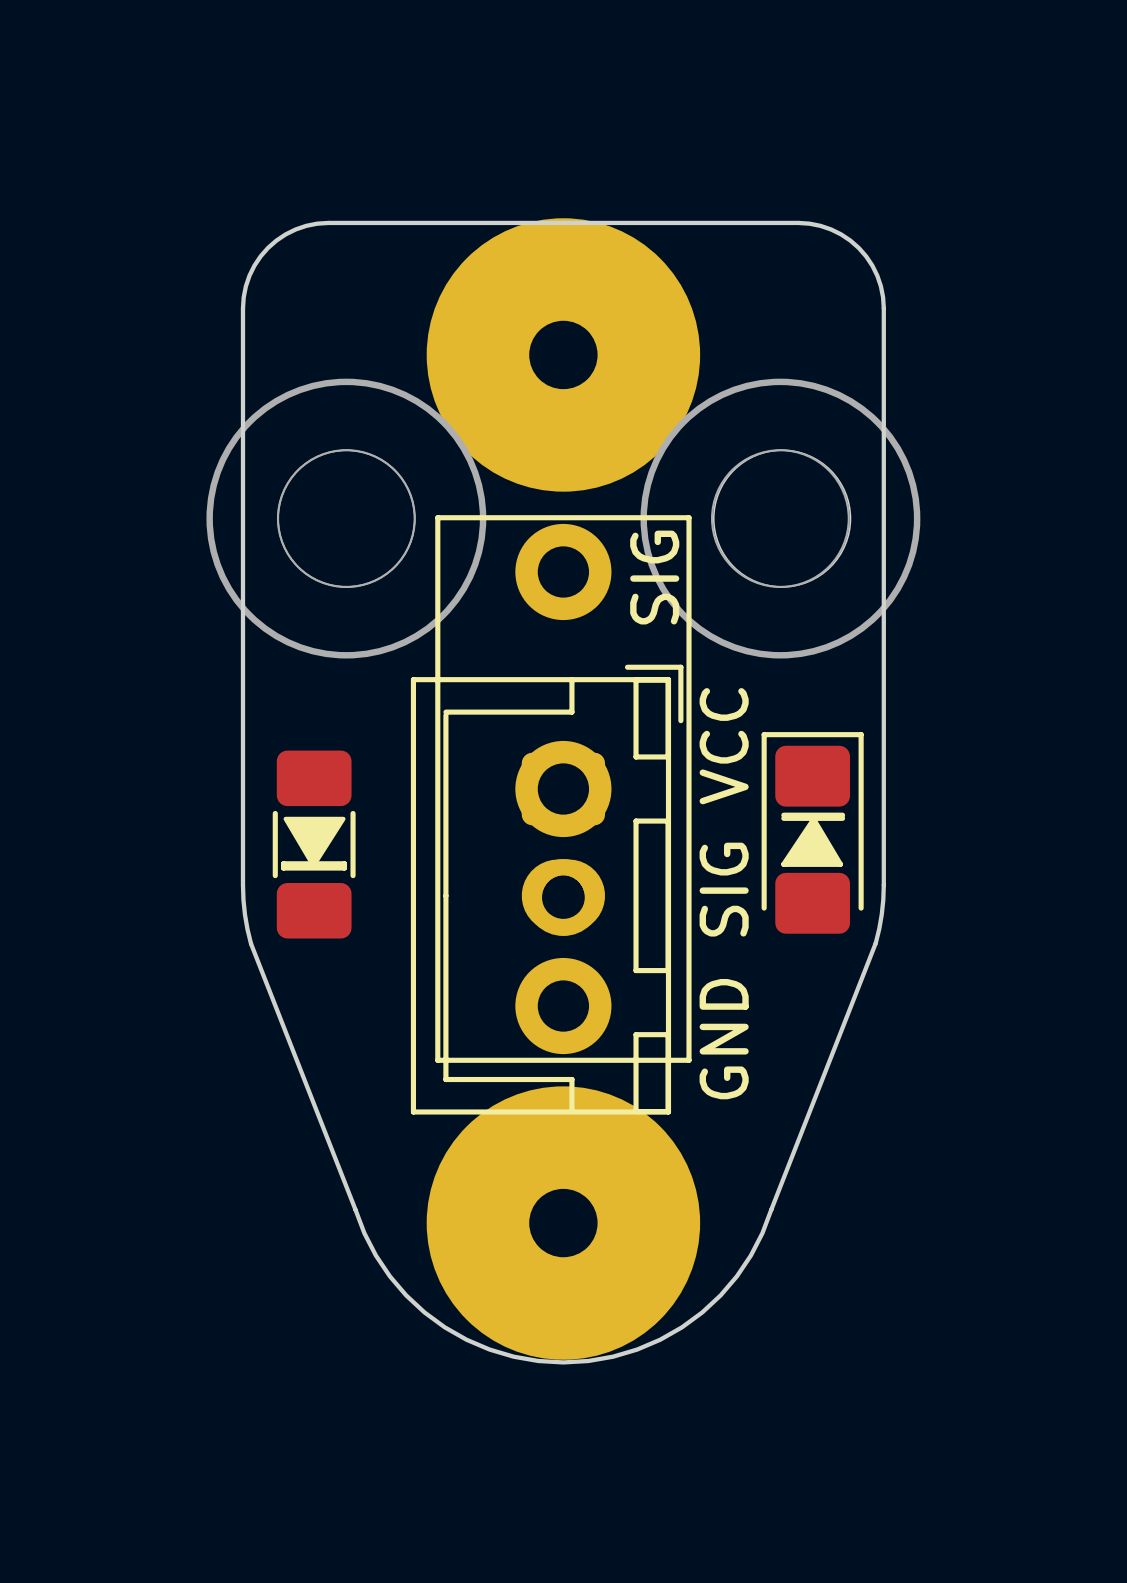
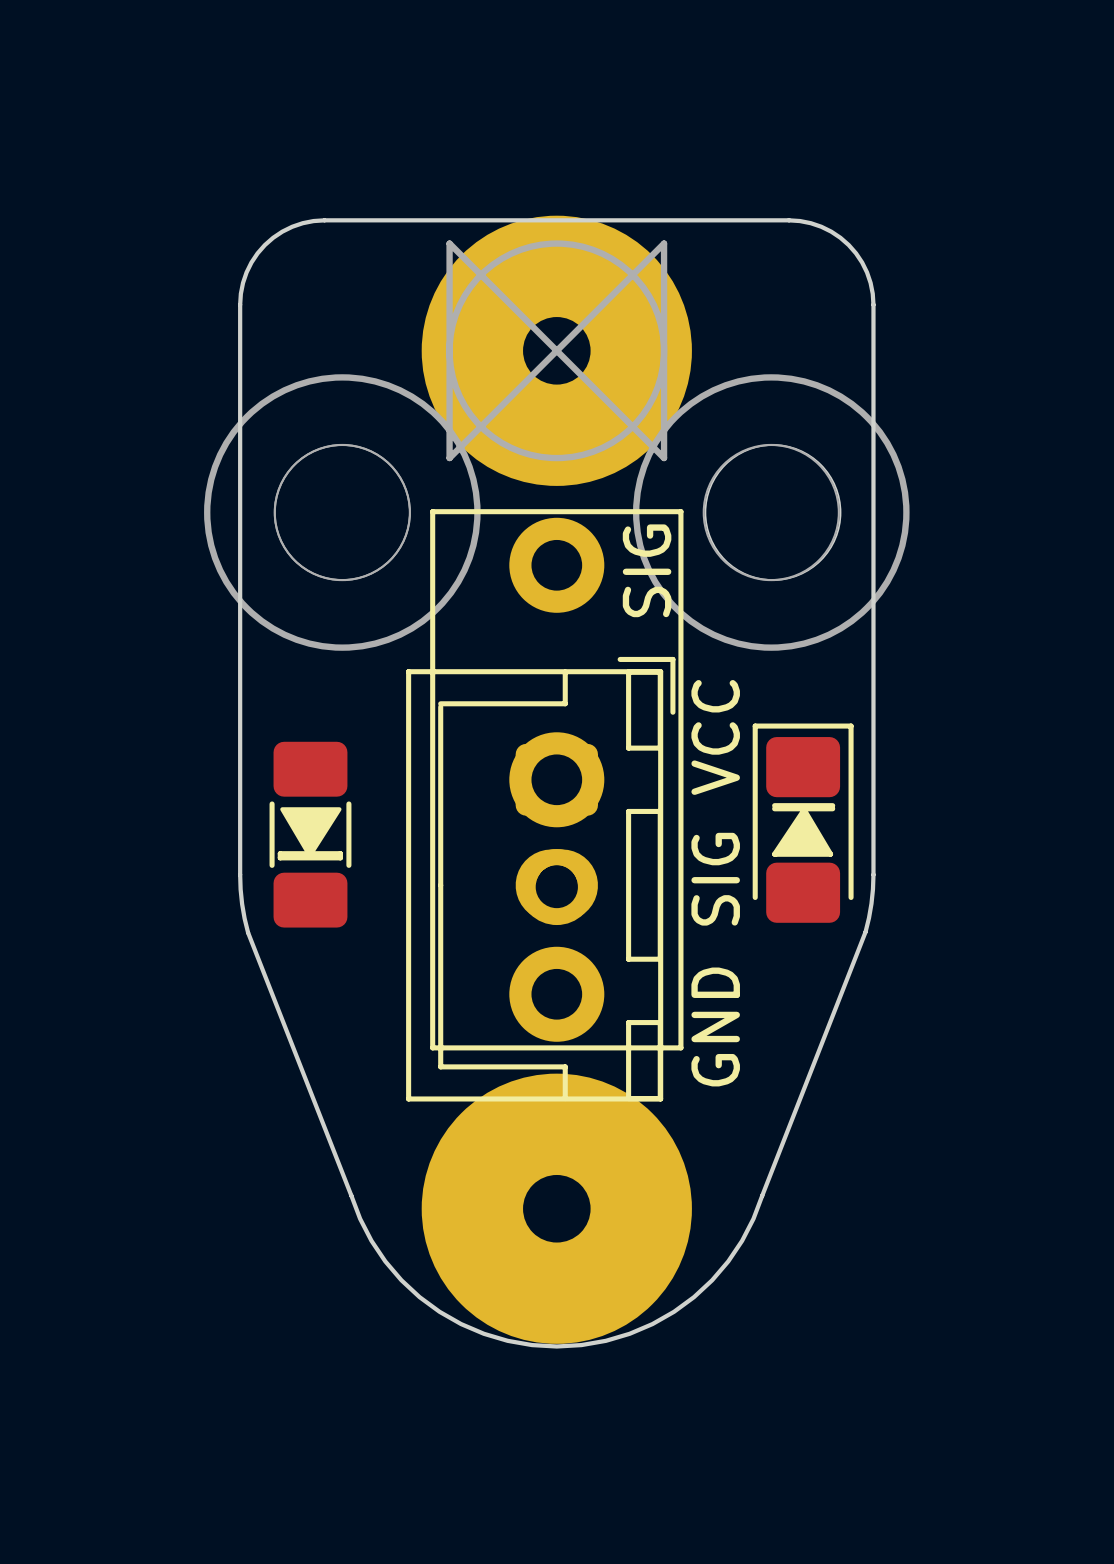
drawing: none -> [446, 240, 668, 462]
line: none -> (449, 243) (664, 458) (664, 243) (449, 458) (449, 243)

